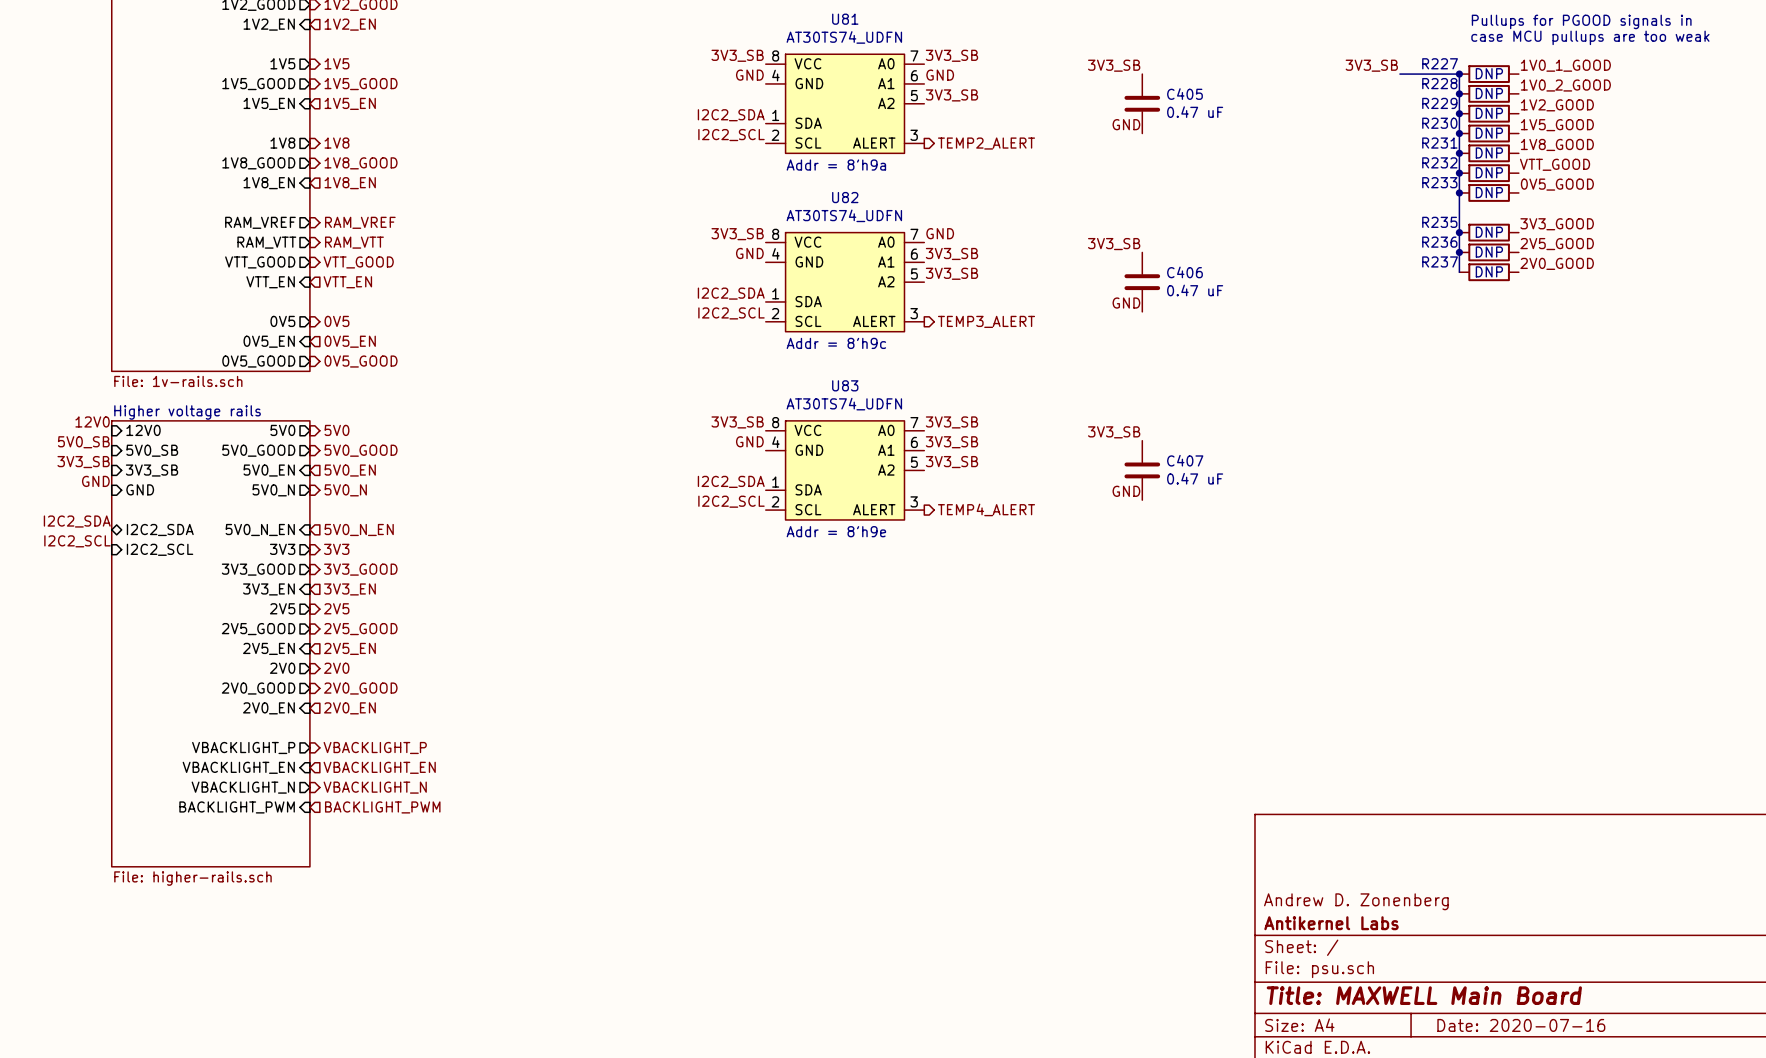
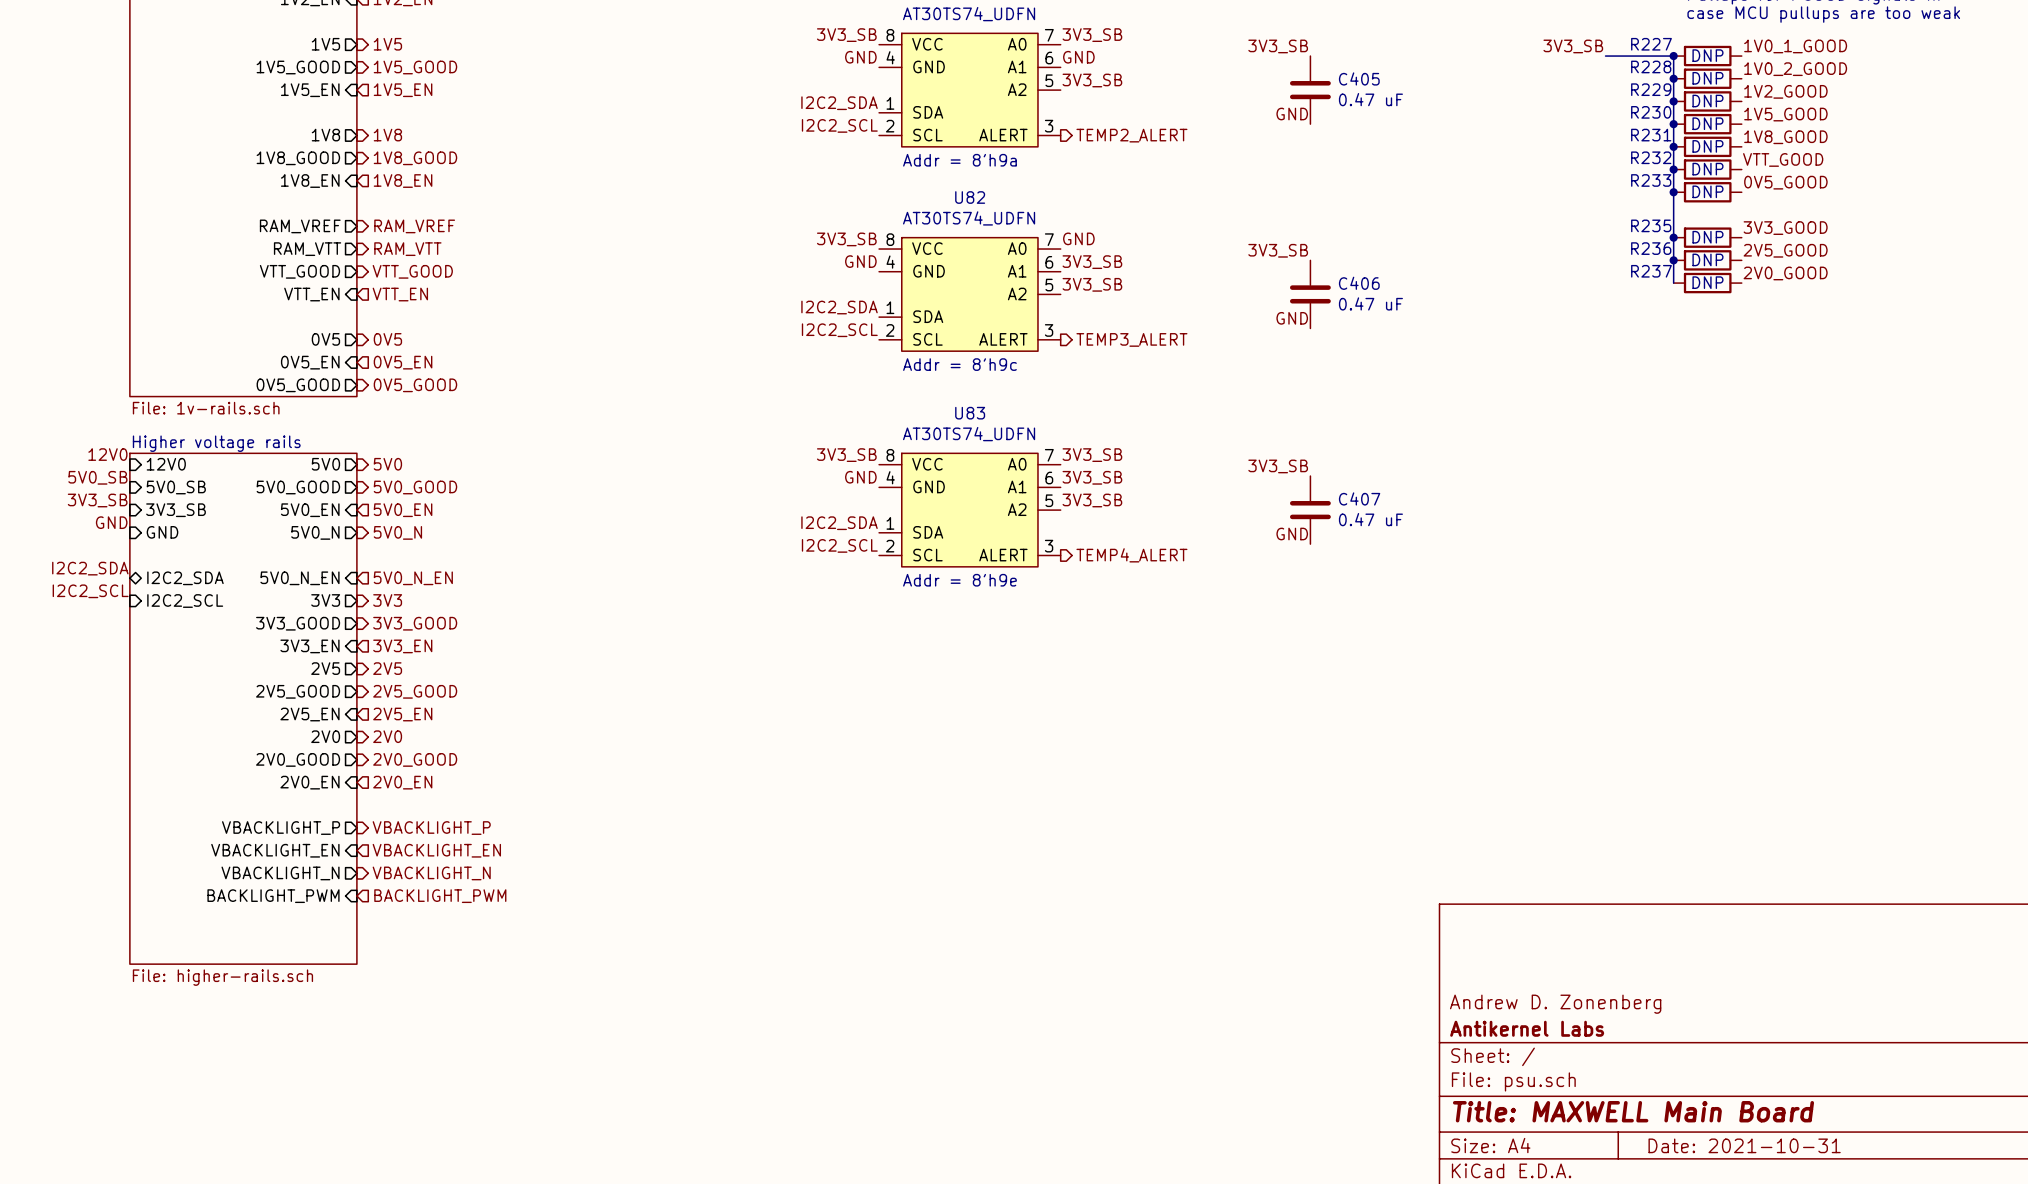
title block: Date: 2020-07-16 (1521, 1025) -> Date: 2021-10-31 (1744, 1145)

